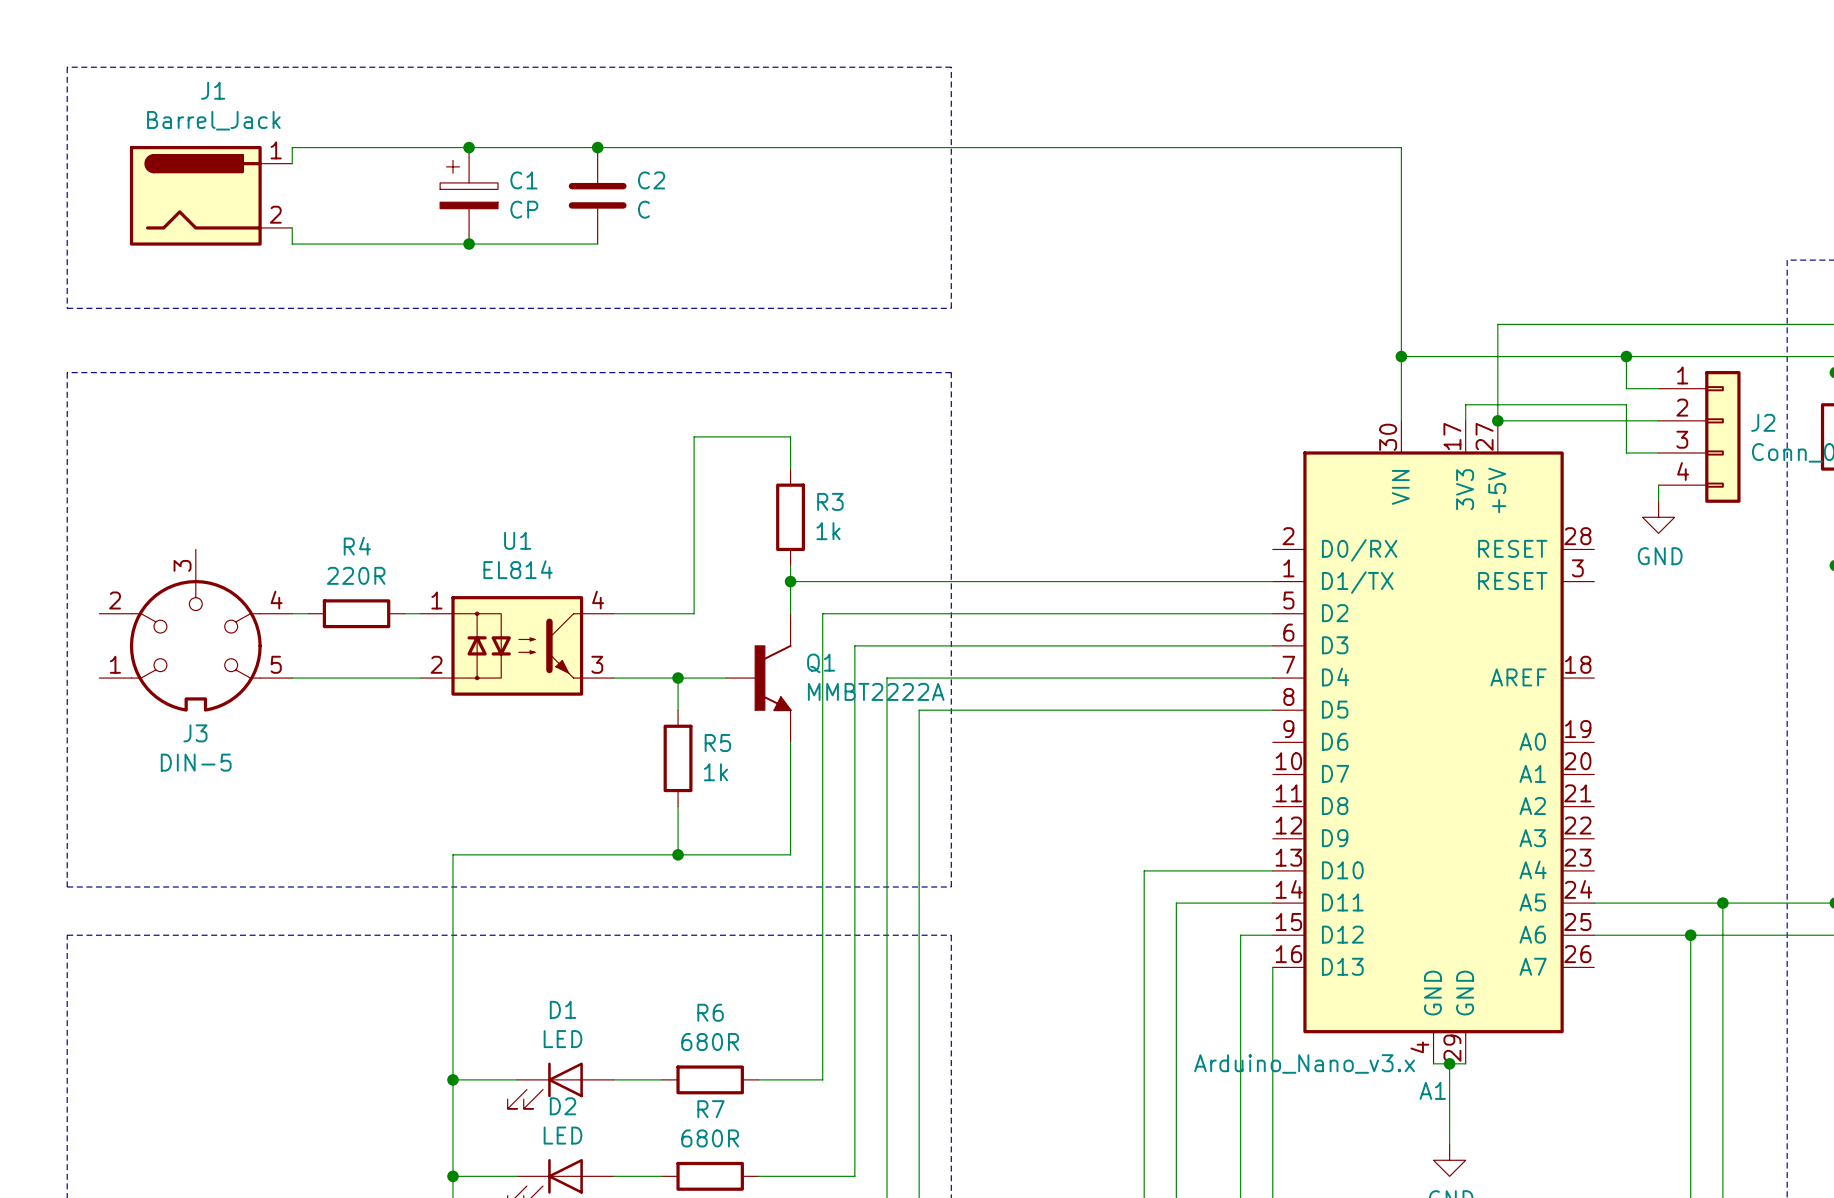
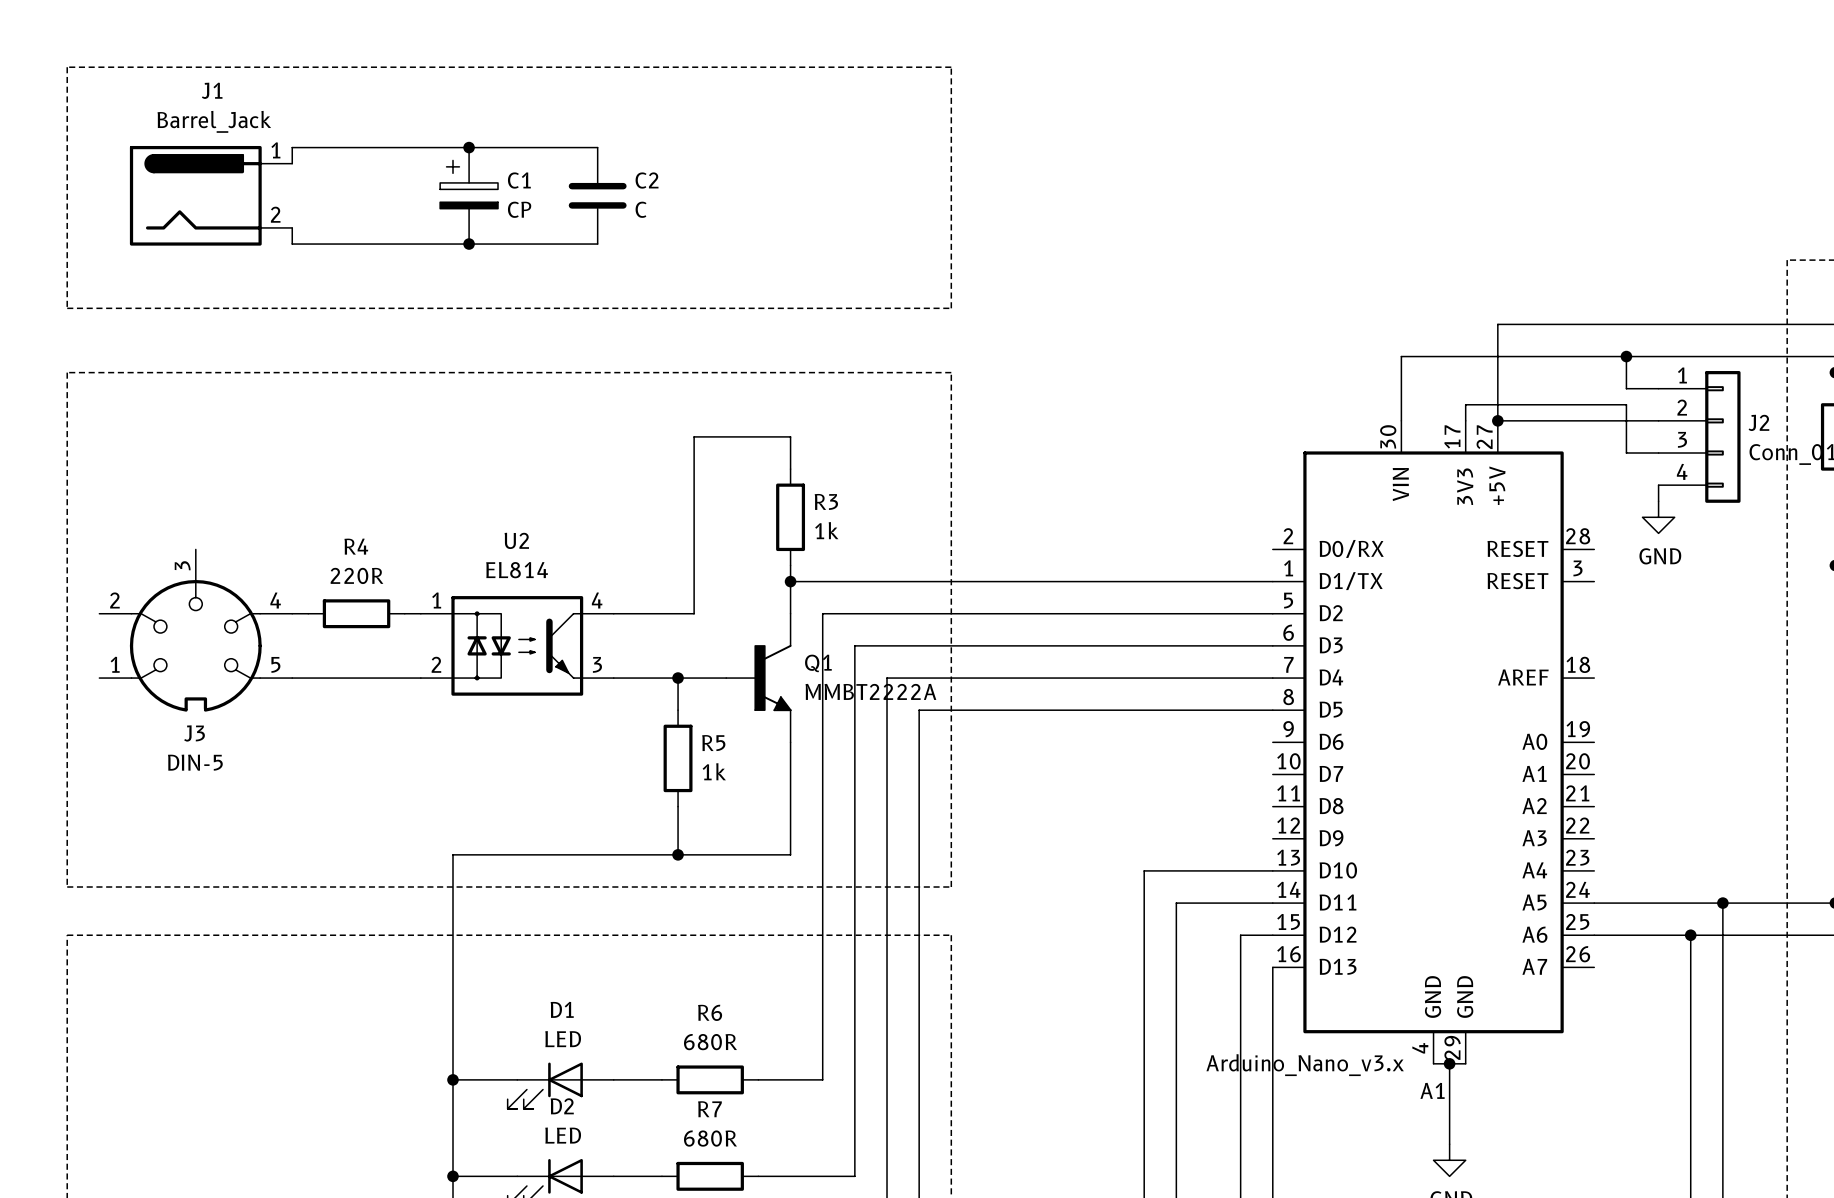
wire: (597, 147) (1401, 147) (1401, 356) -> none
junction: (597, 147) -> none
junction: (1401, 356) -> none
U1 name: U1 (517, 540) -> U2 (516, 540)

